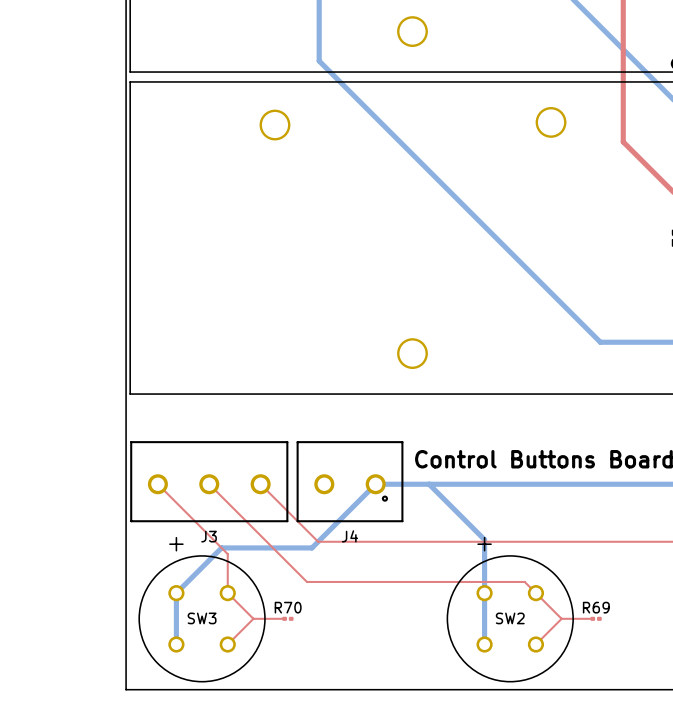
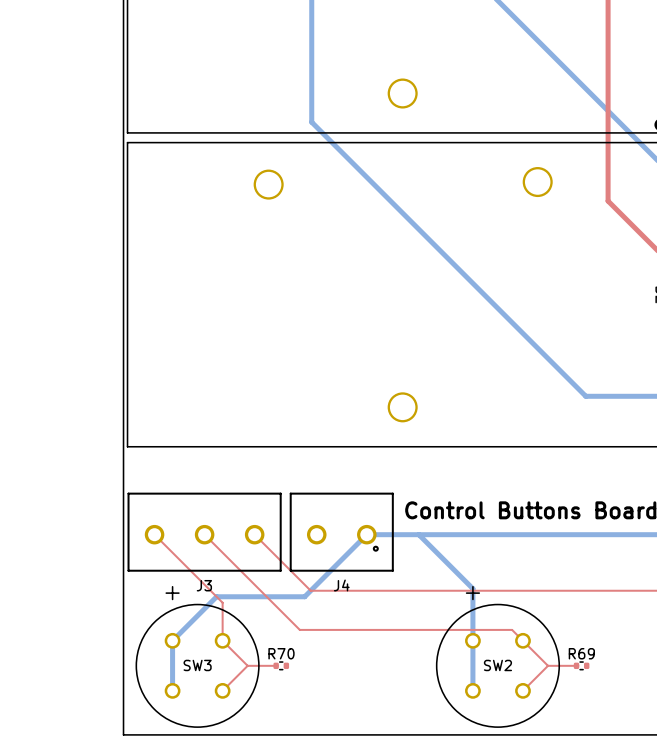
R70 footprint: [282, 616, 294, 621] -> [273, 661, 290, 671]
R69 footprint: [590, 616, 602, 621] -> [573, 661, 590, 671]

